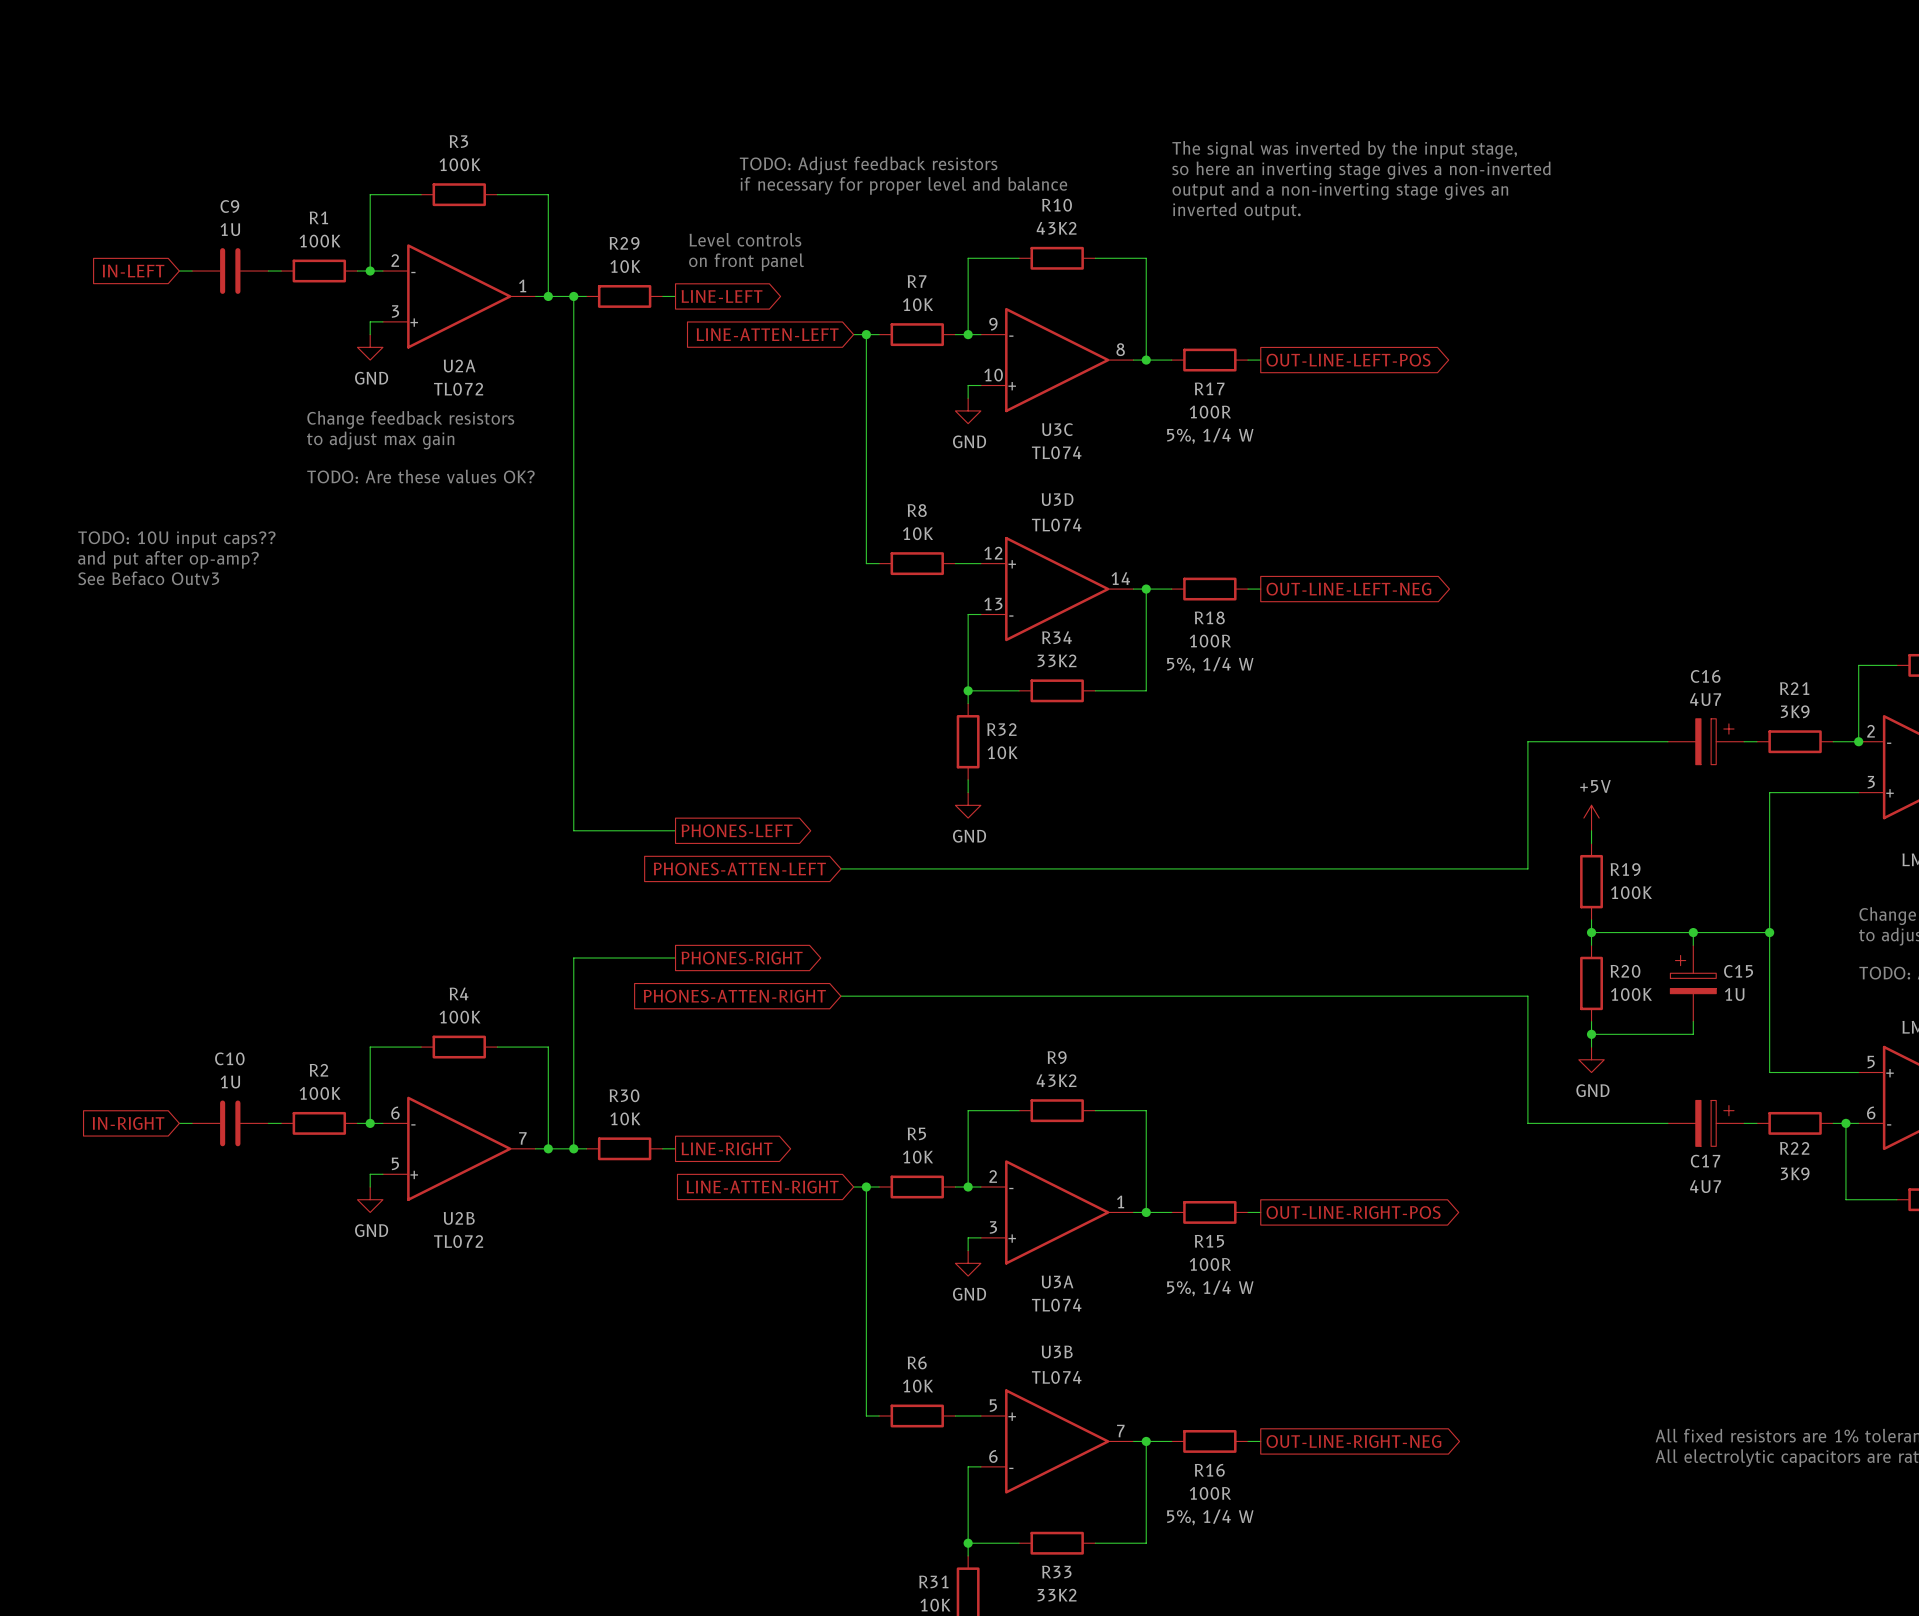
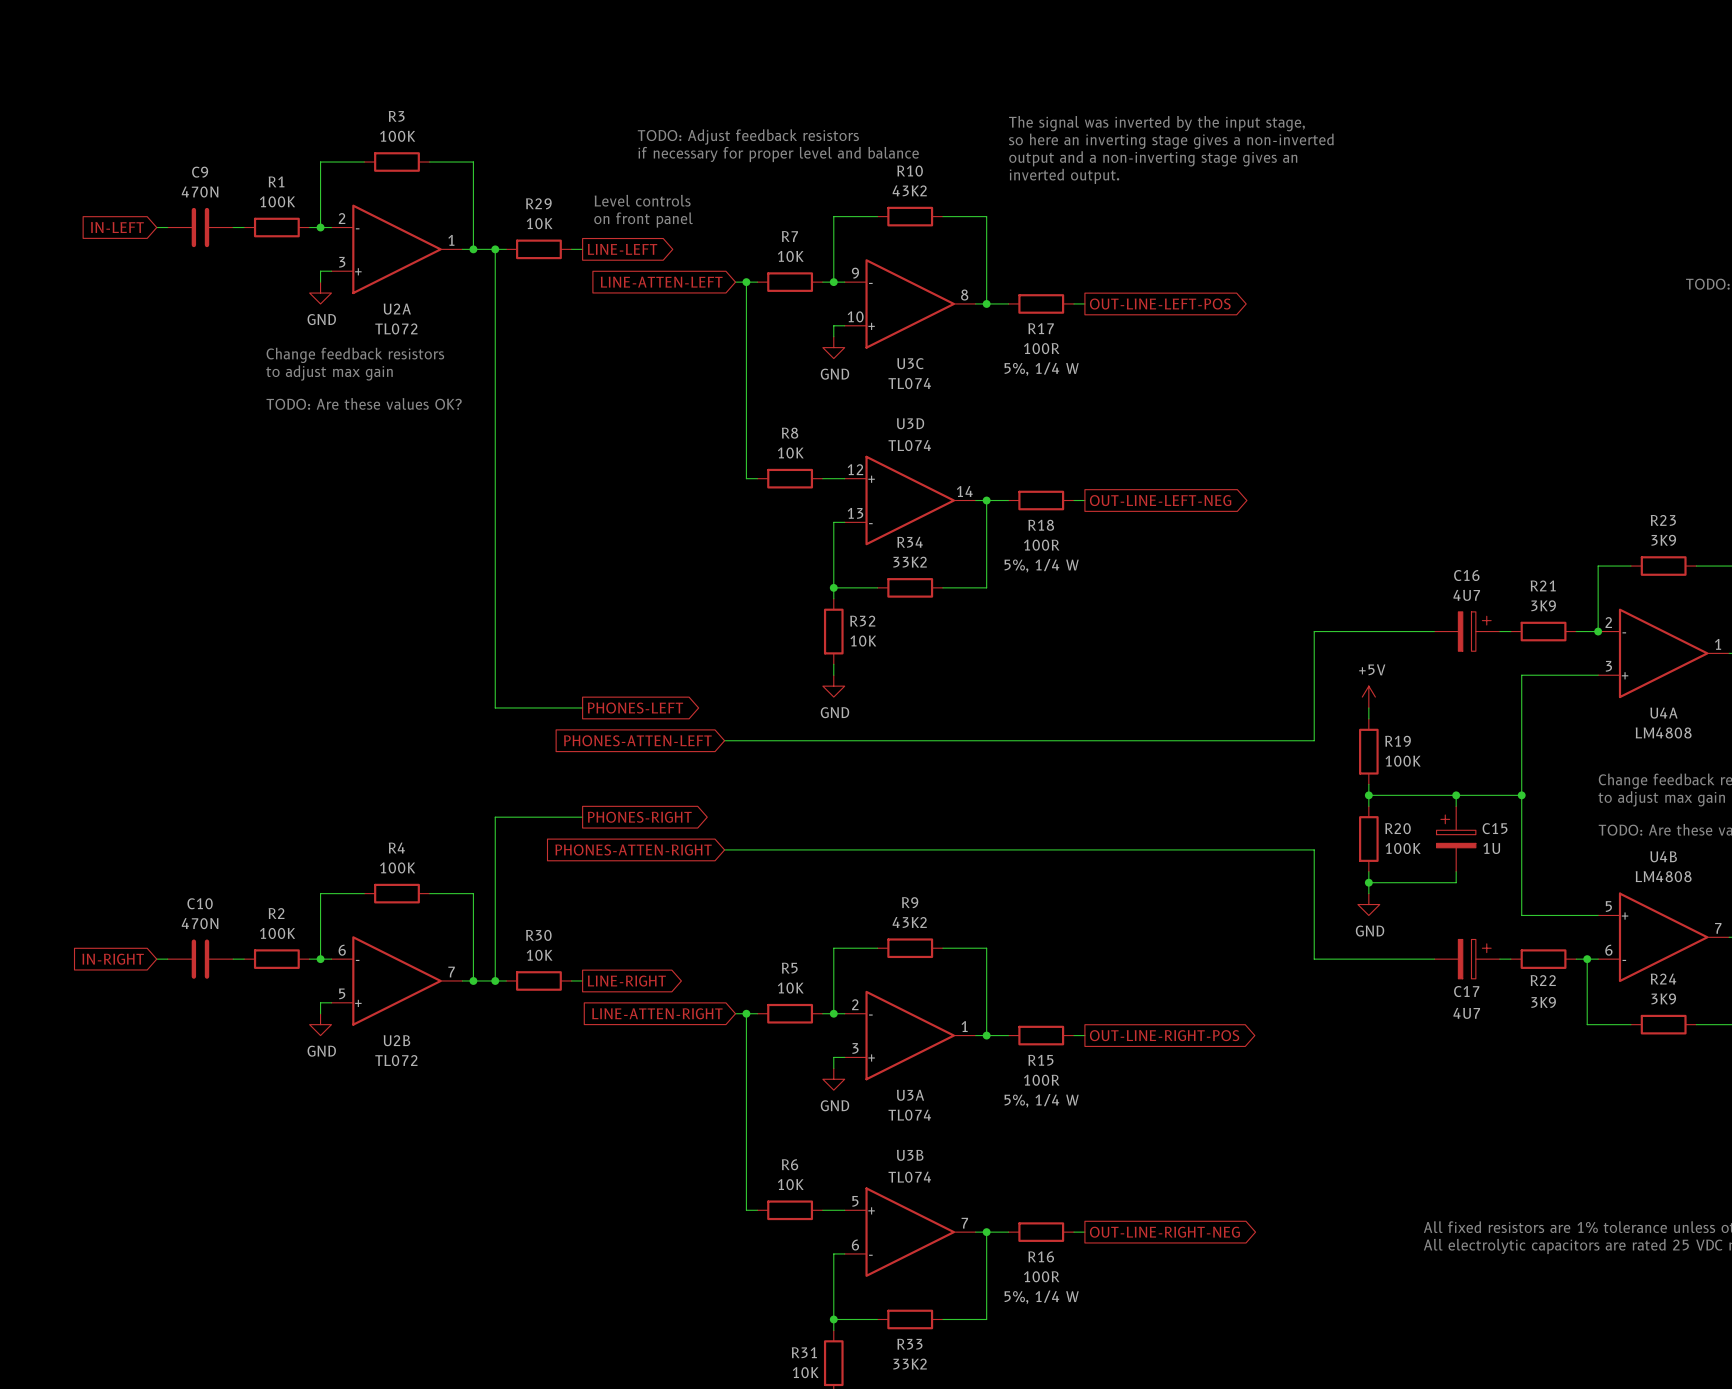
C9 value: 1U (230, 229) -> 470N (200, 192)
text: TODO: 10U input caps?? (176, 539) -> none
text: and put after op-amp? (168, 559) -> none
text: See Befaco Outv3 (148, 578) -> none
C10 value: 1U (230, 1082) -> 470N (200, 923)

